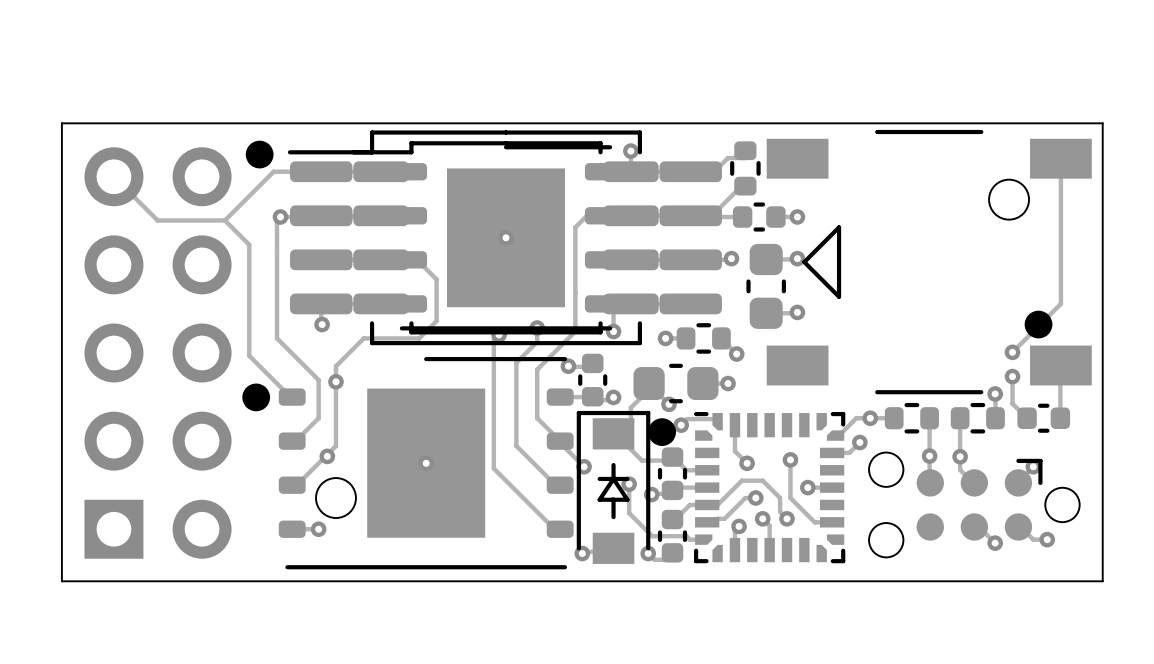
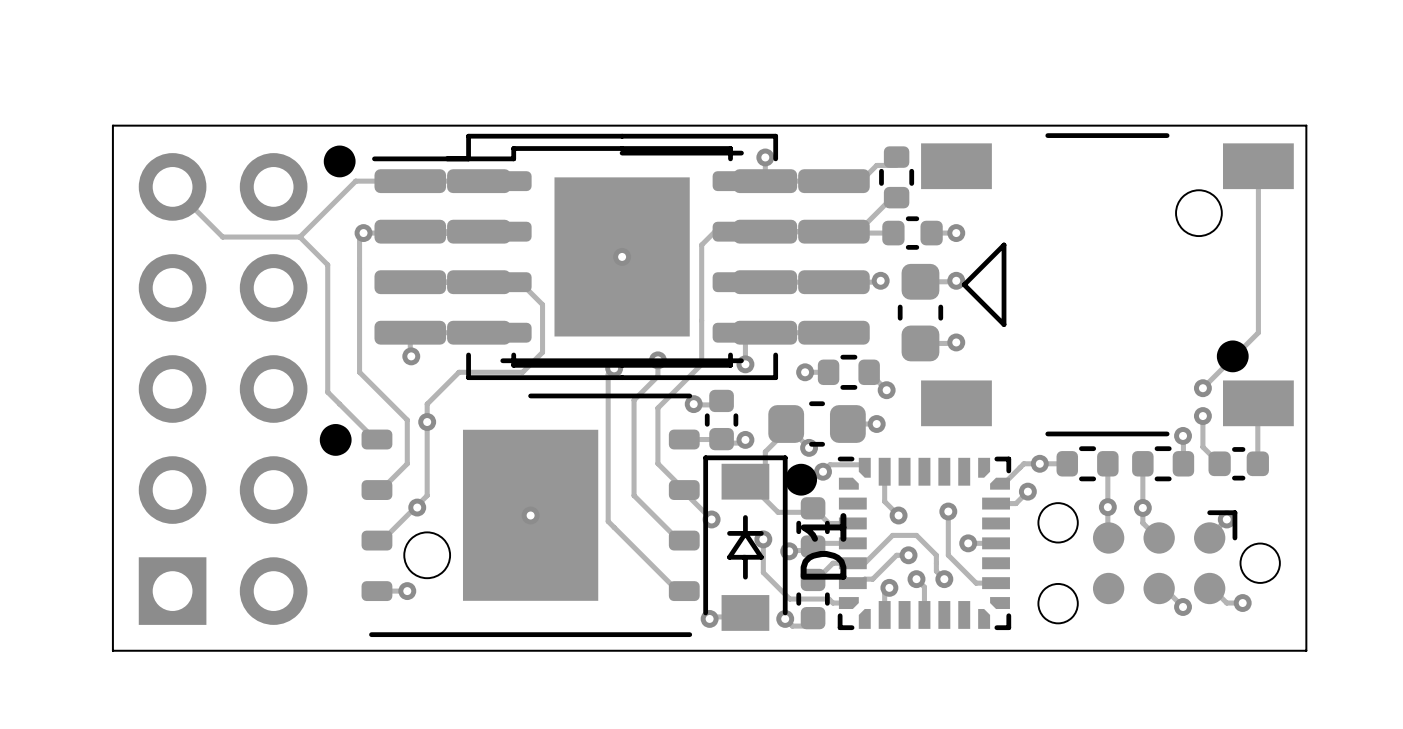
D1 name: none -> D1 (823, 546)

